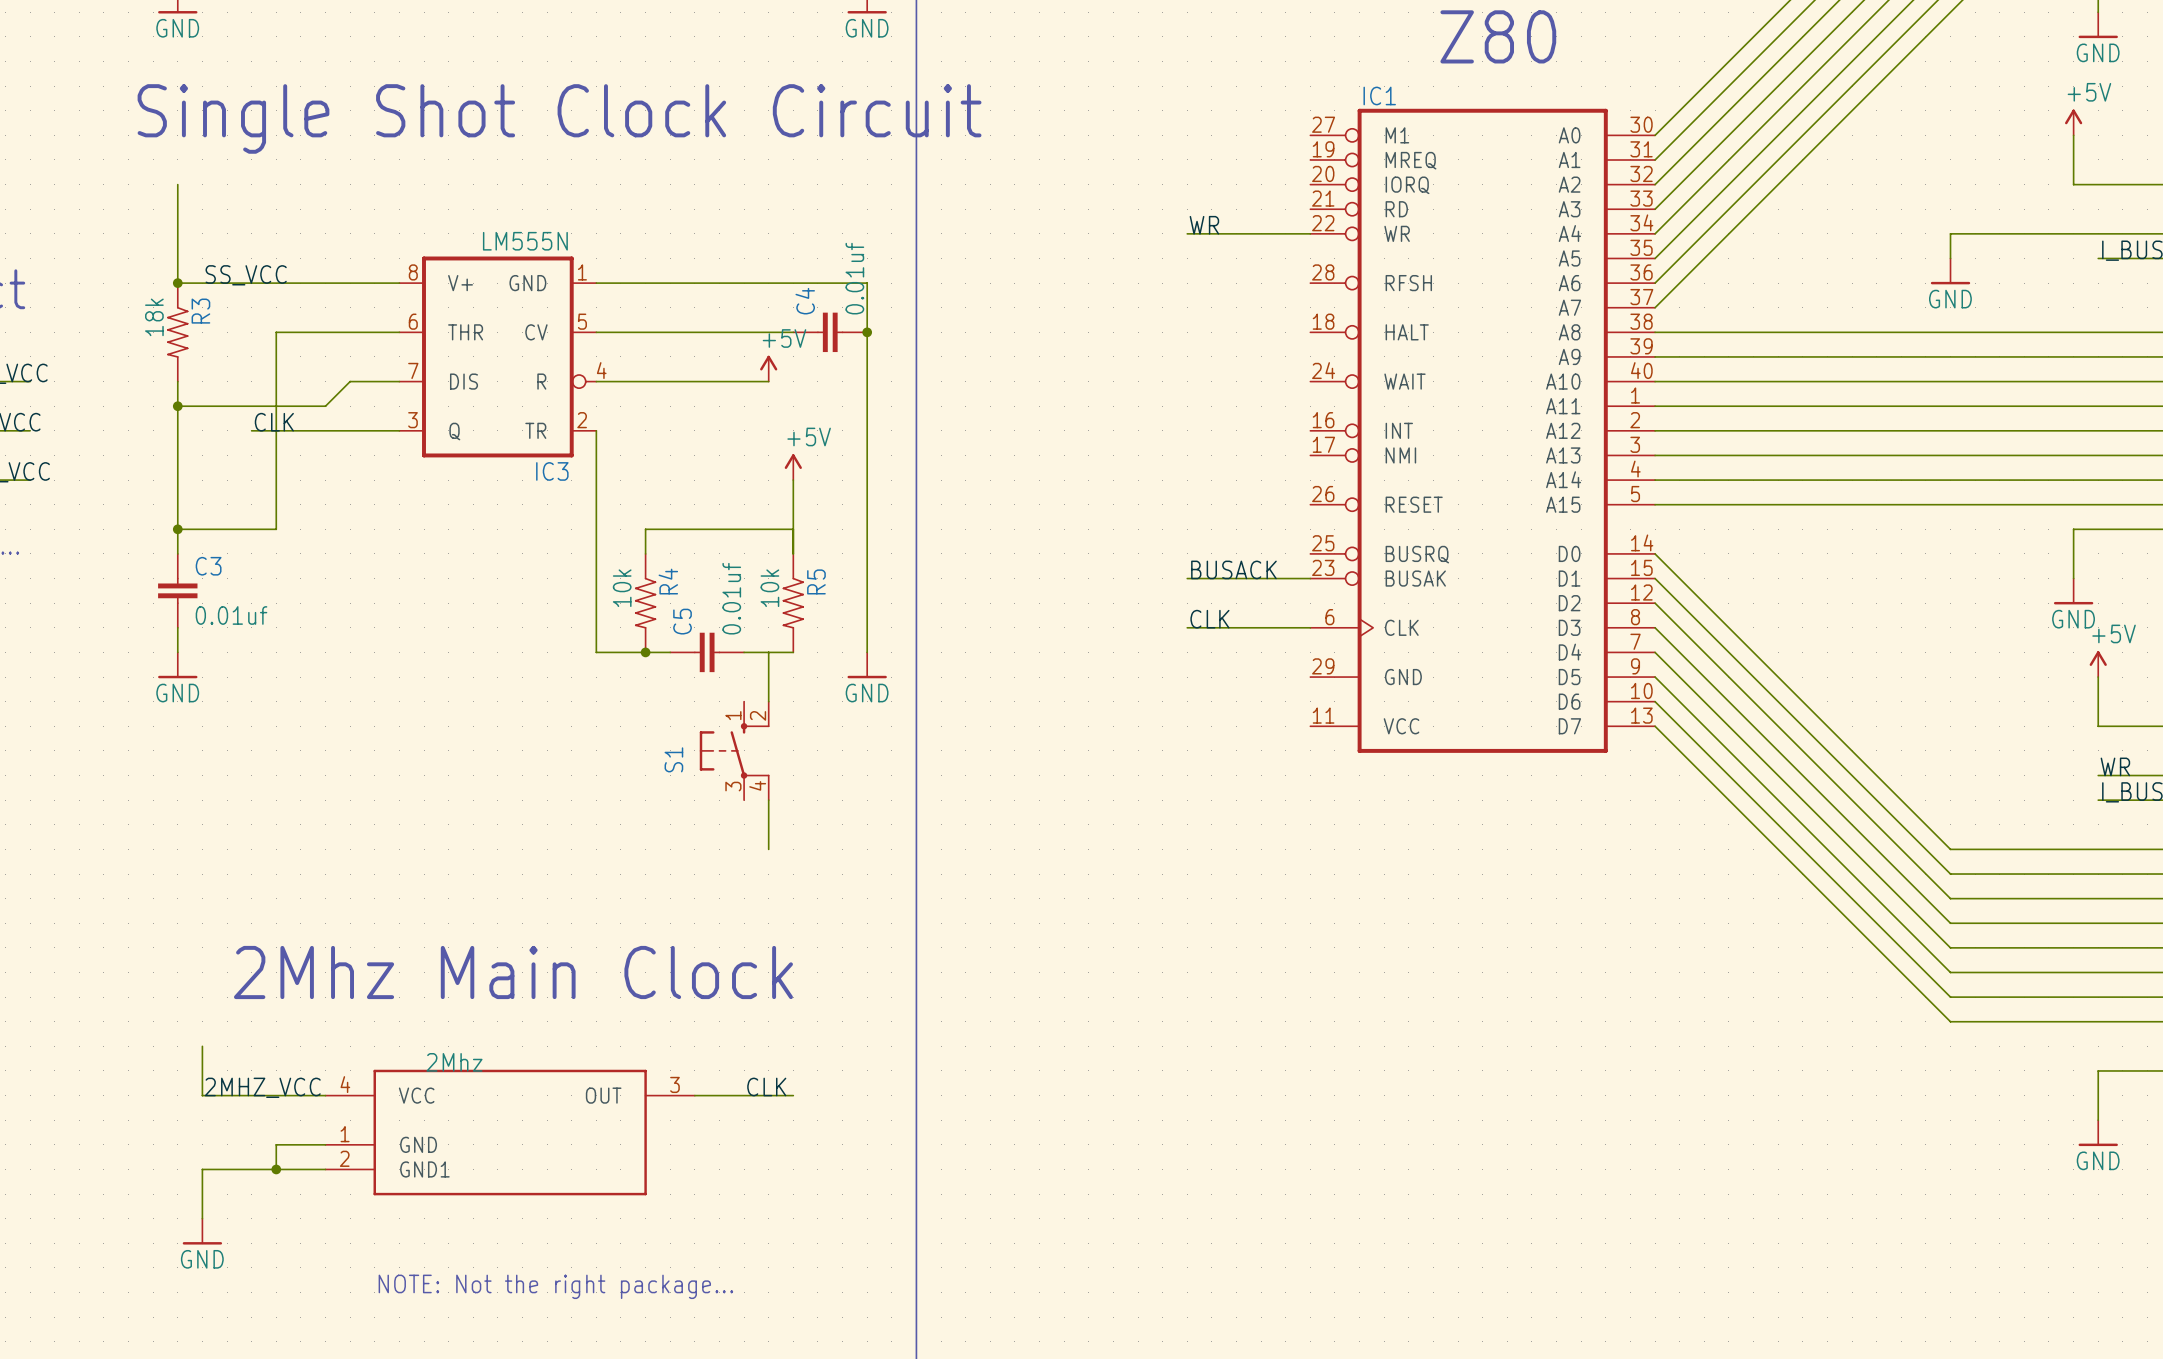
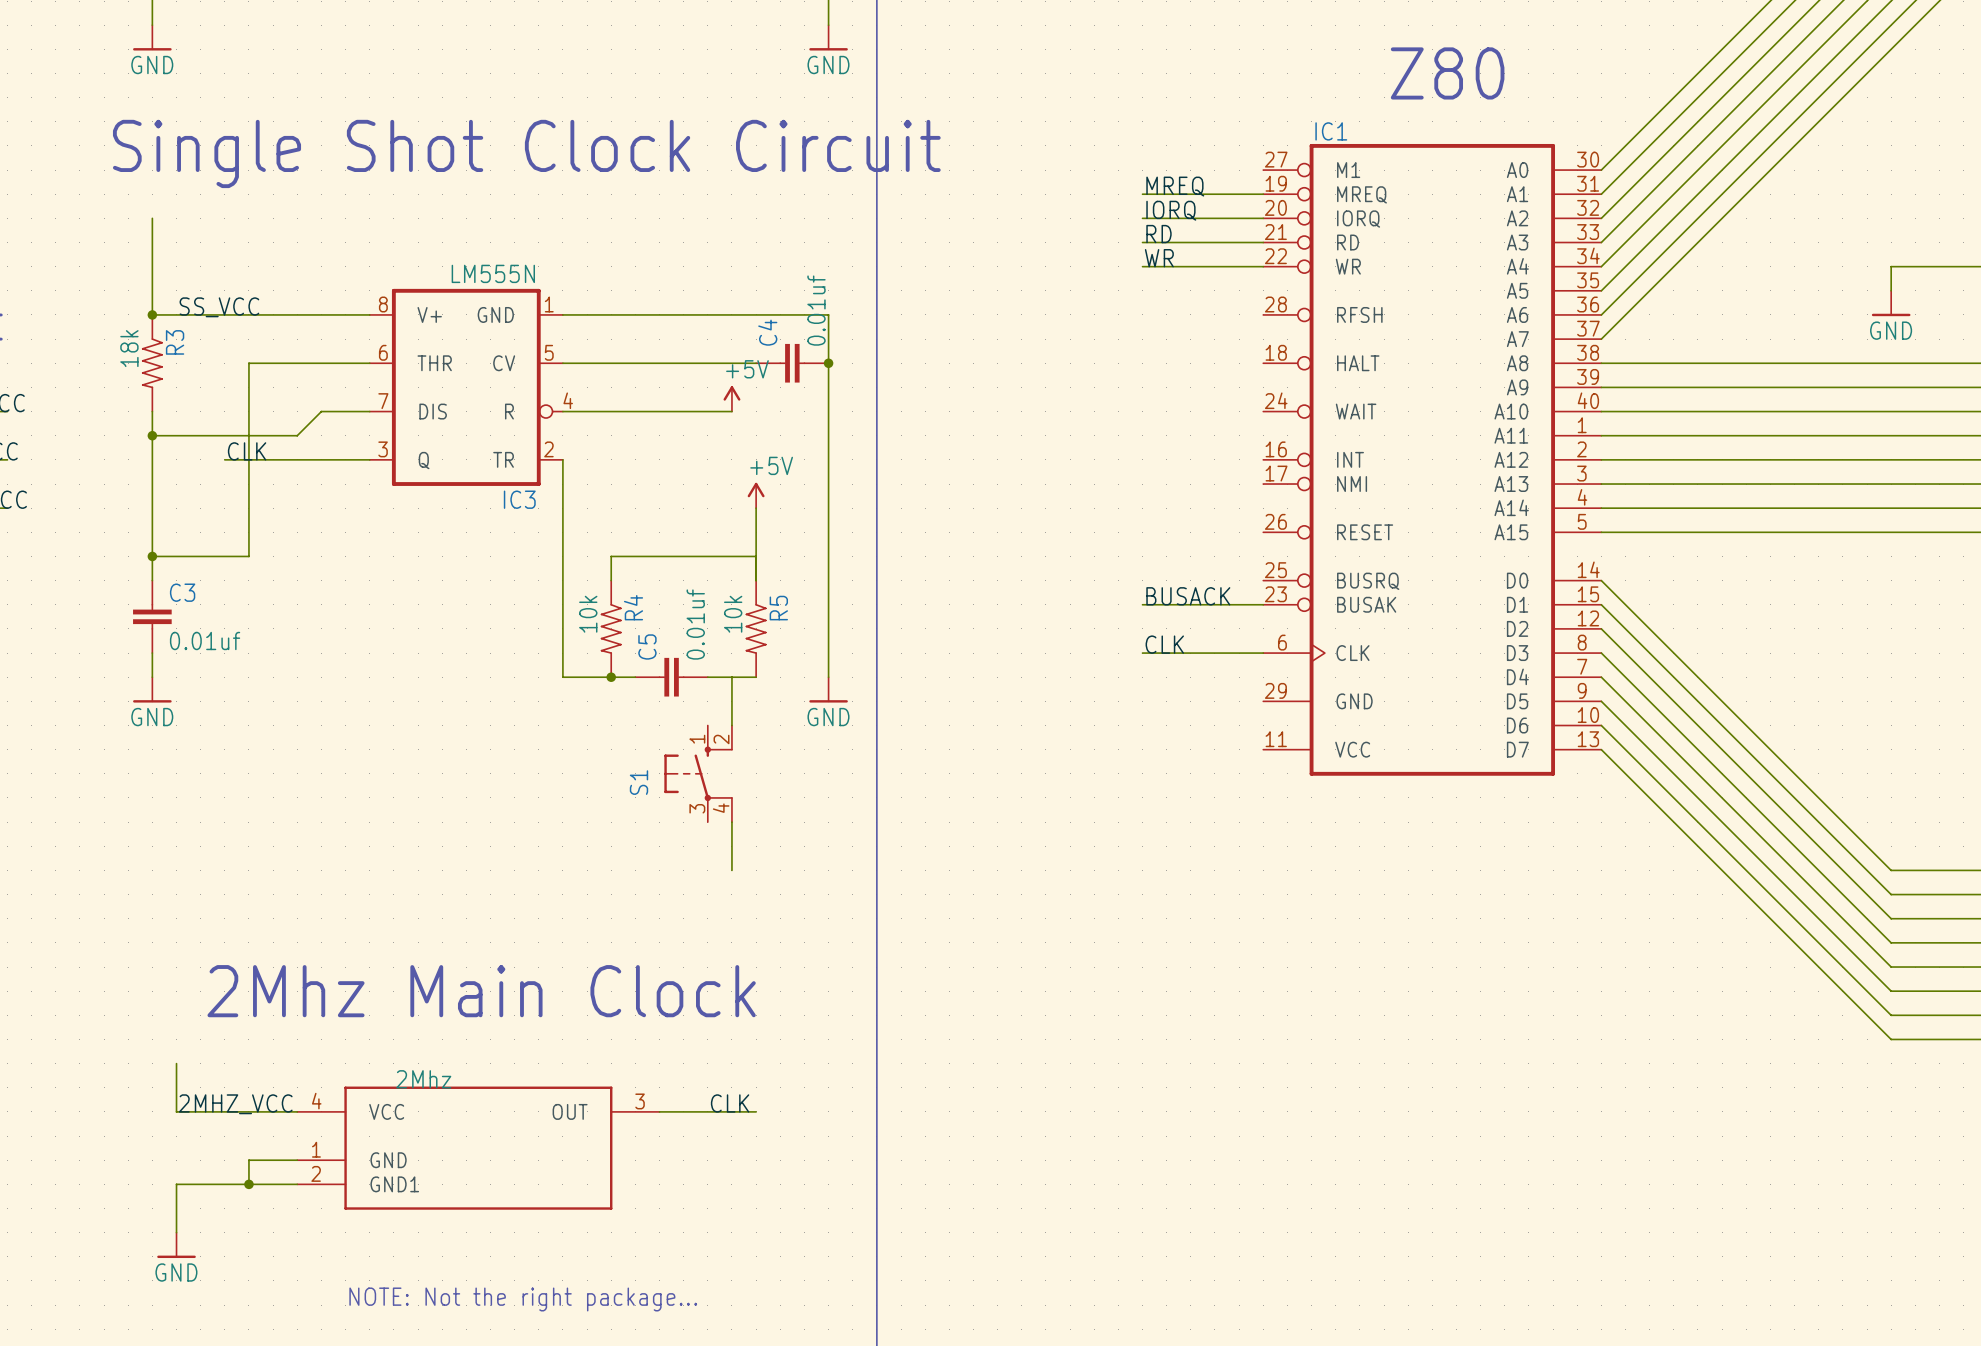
label: none -> MREQ (1175, 186)
wire: none -> (1142, 194) (1263, 194)
label: none -> IORQ (1171, 210)
wire: none -> (1142, 218) (1263, 218)
label: none -> RD (1158, 234)
wire: none -> (1142, 242) (1263, 242)

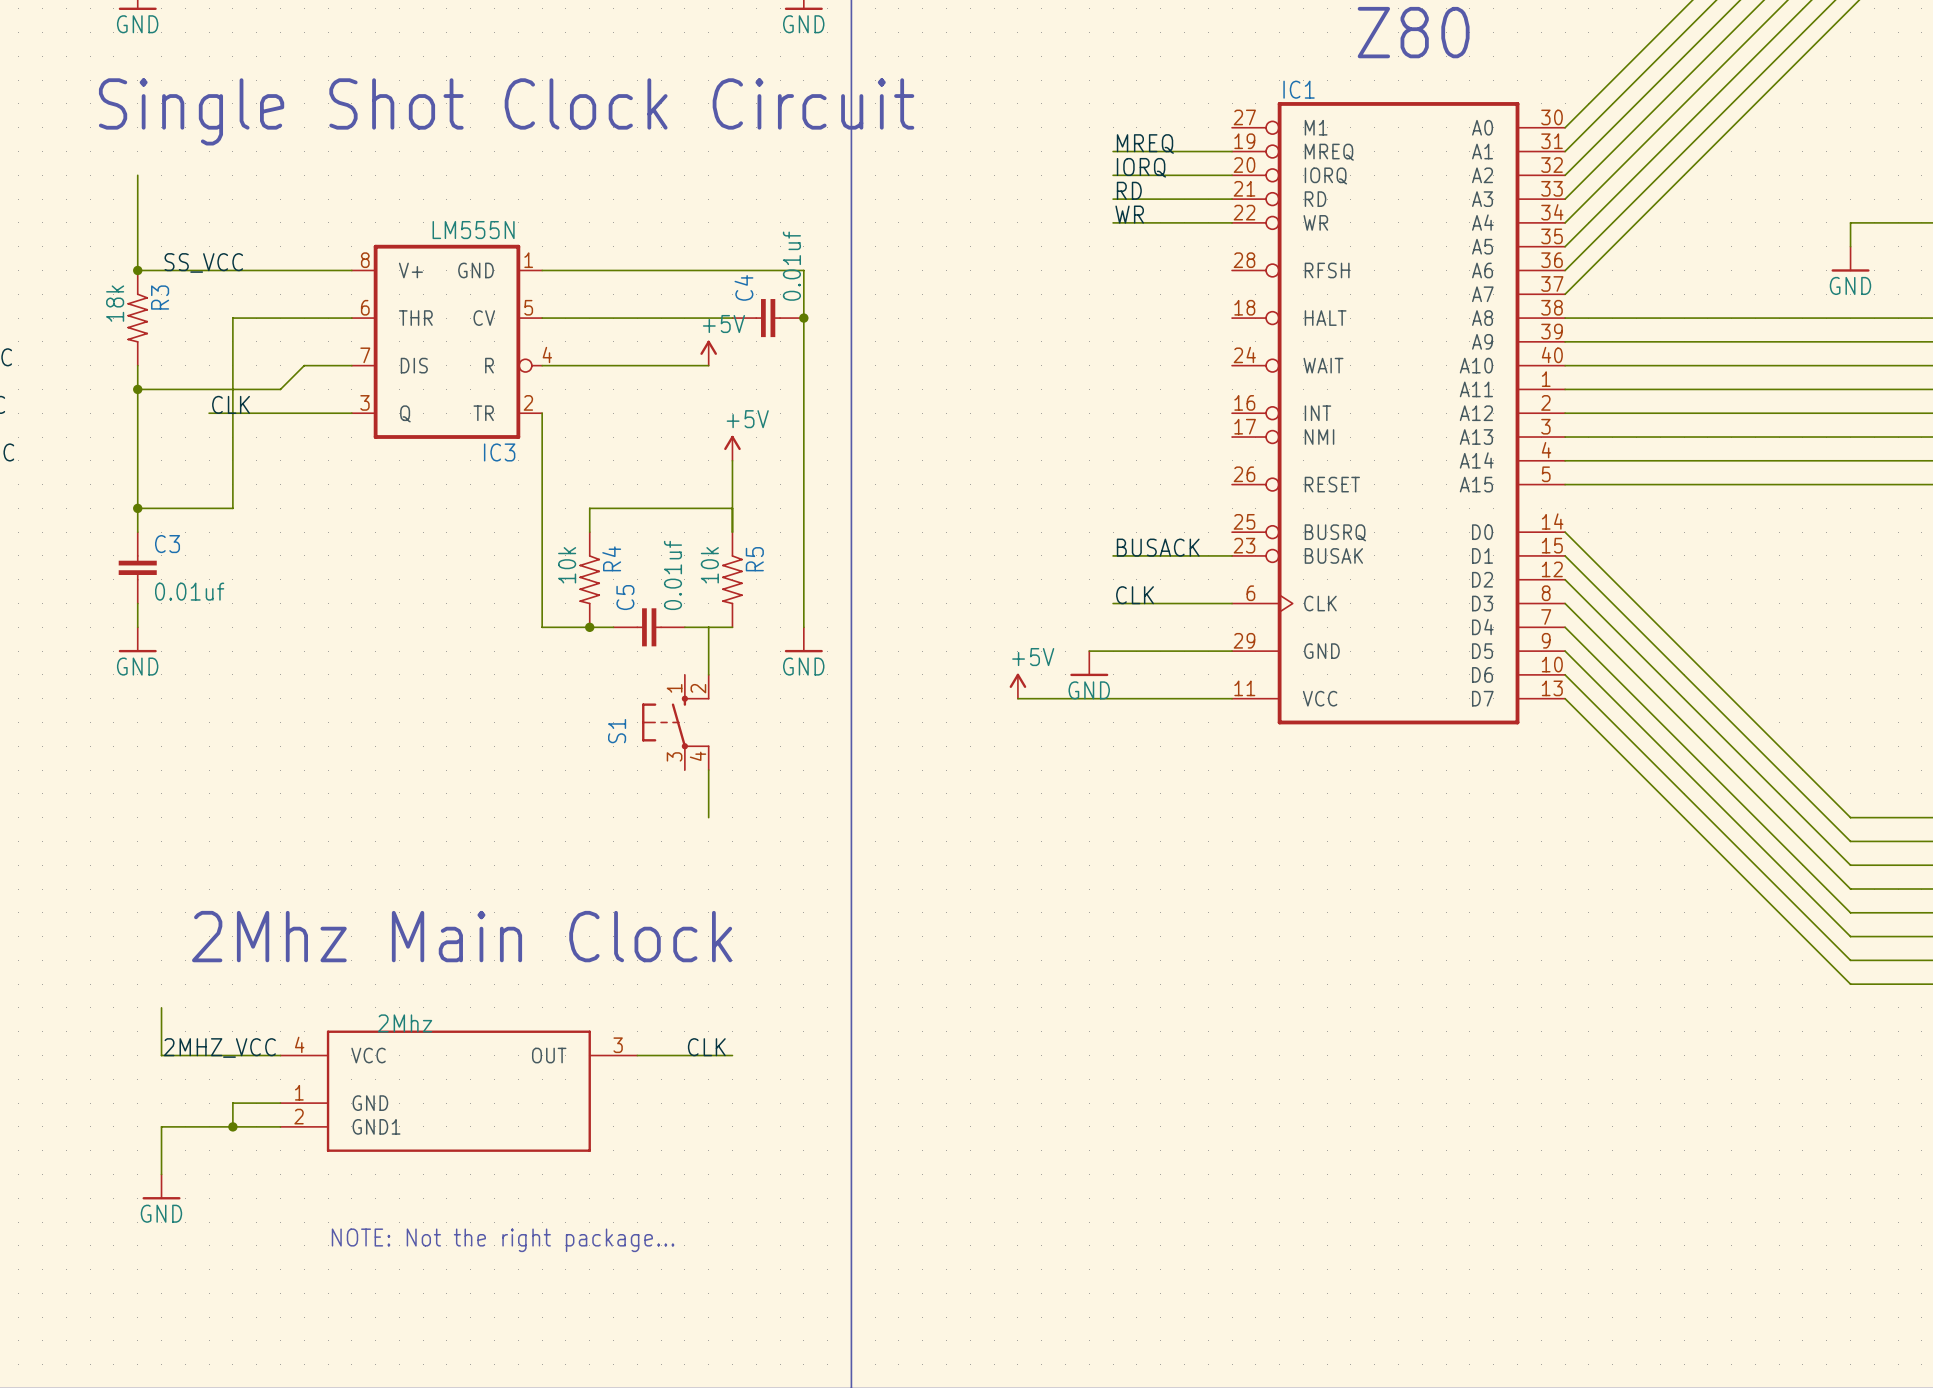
wire: none -> (1089, 651) (1232, 651)
power symbol: none -> GND (1089, 663)
power symbol: none -> +5V (1017, 686)
wire: none -> (1017, 698) (1232, 698)

